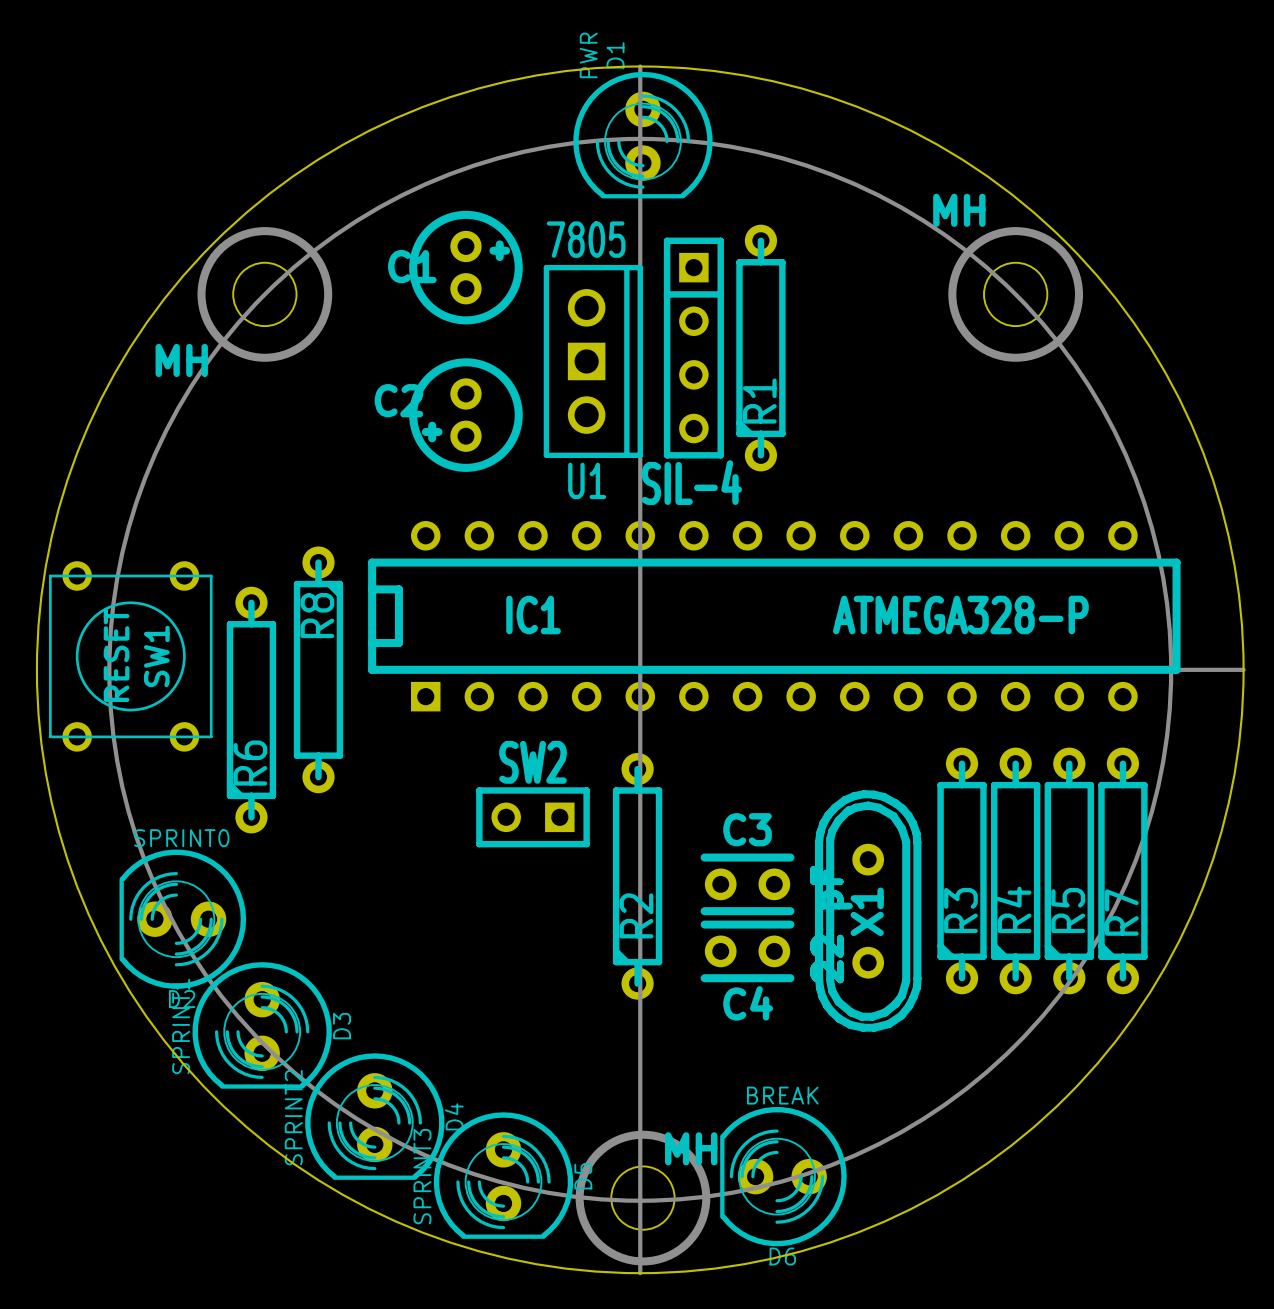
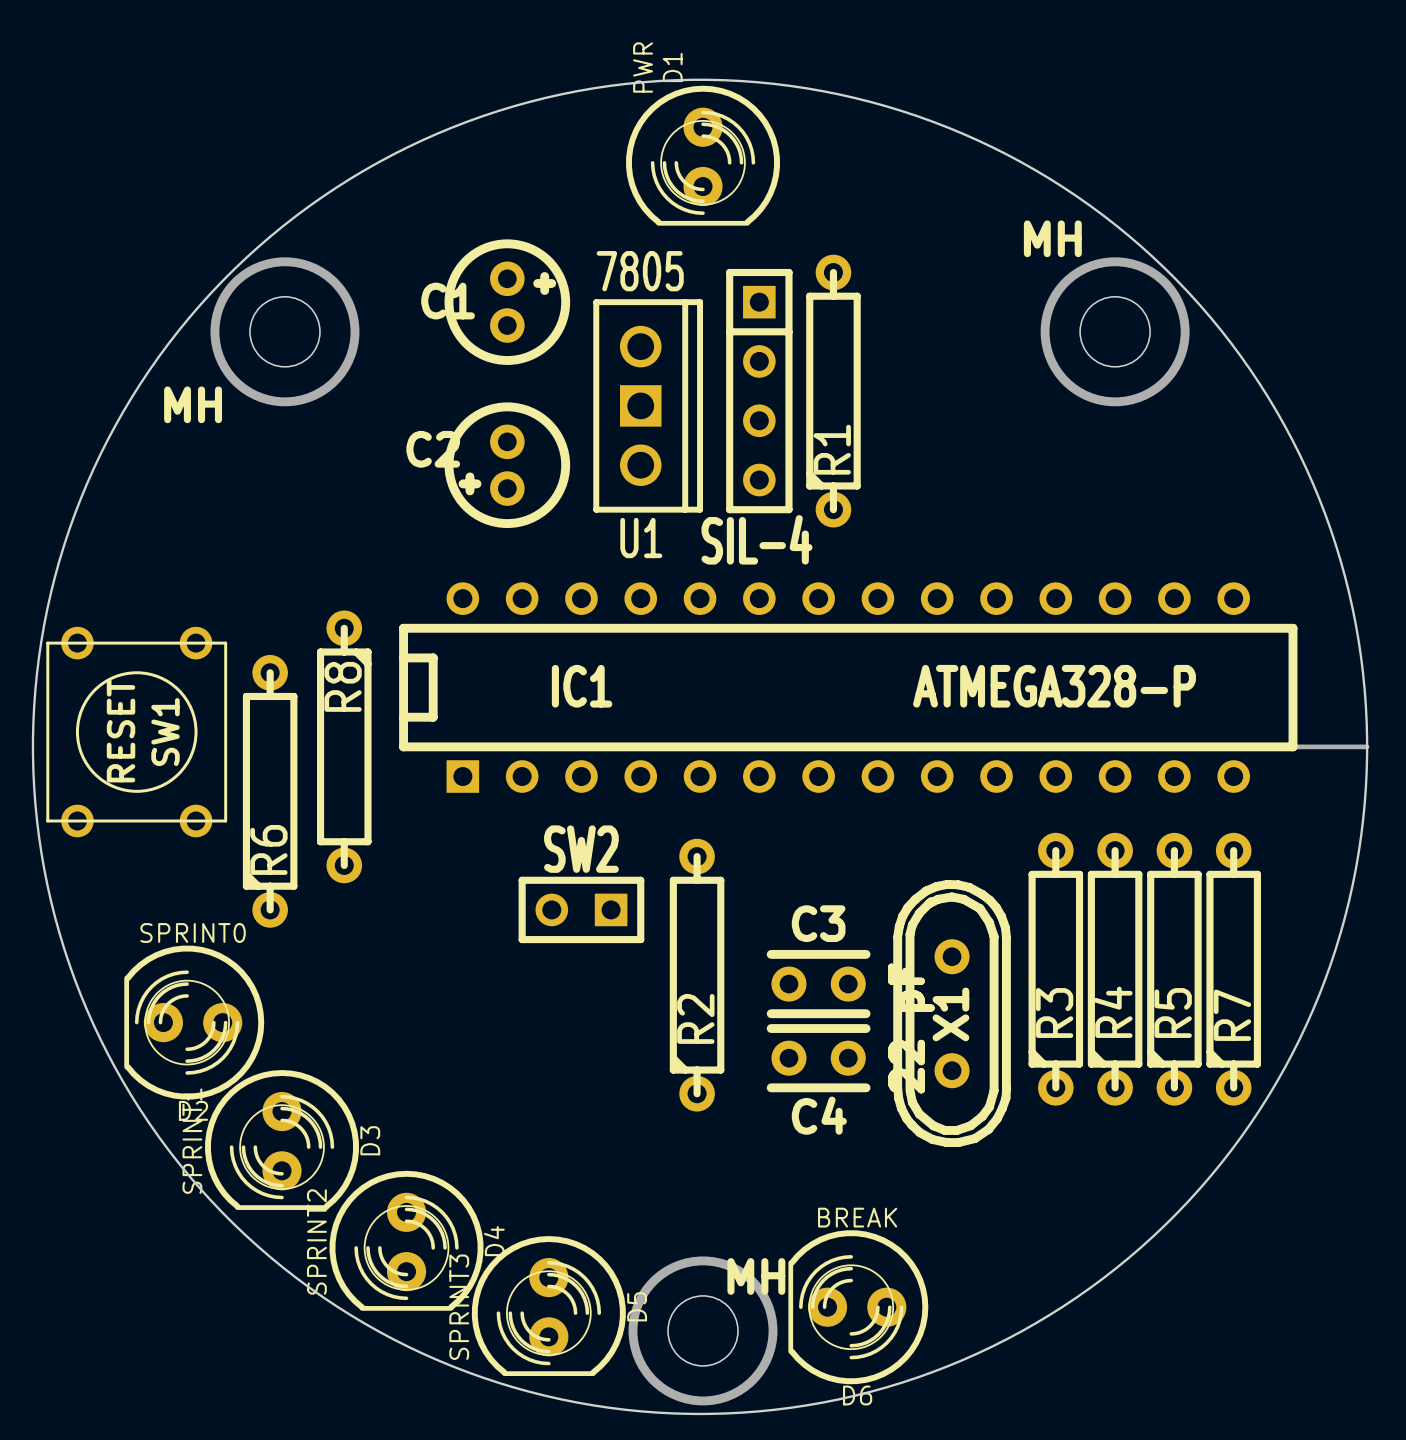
line: (640, 66) (640, 1273) -> none
drawing: [107, 136, 1174, 1203] -> none

